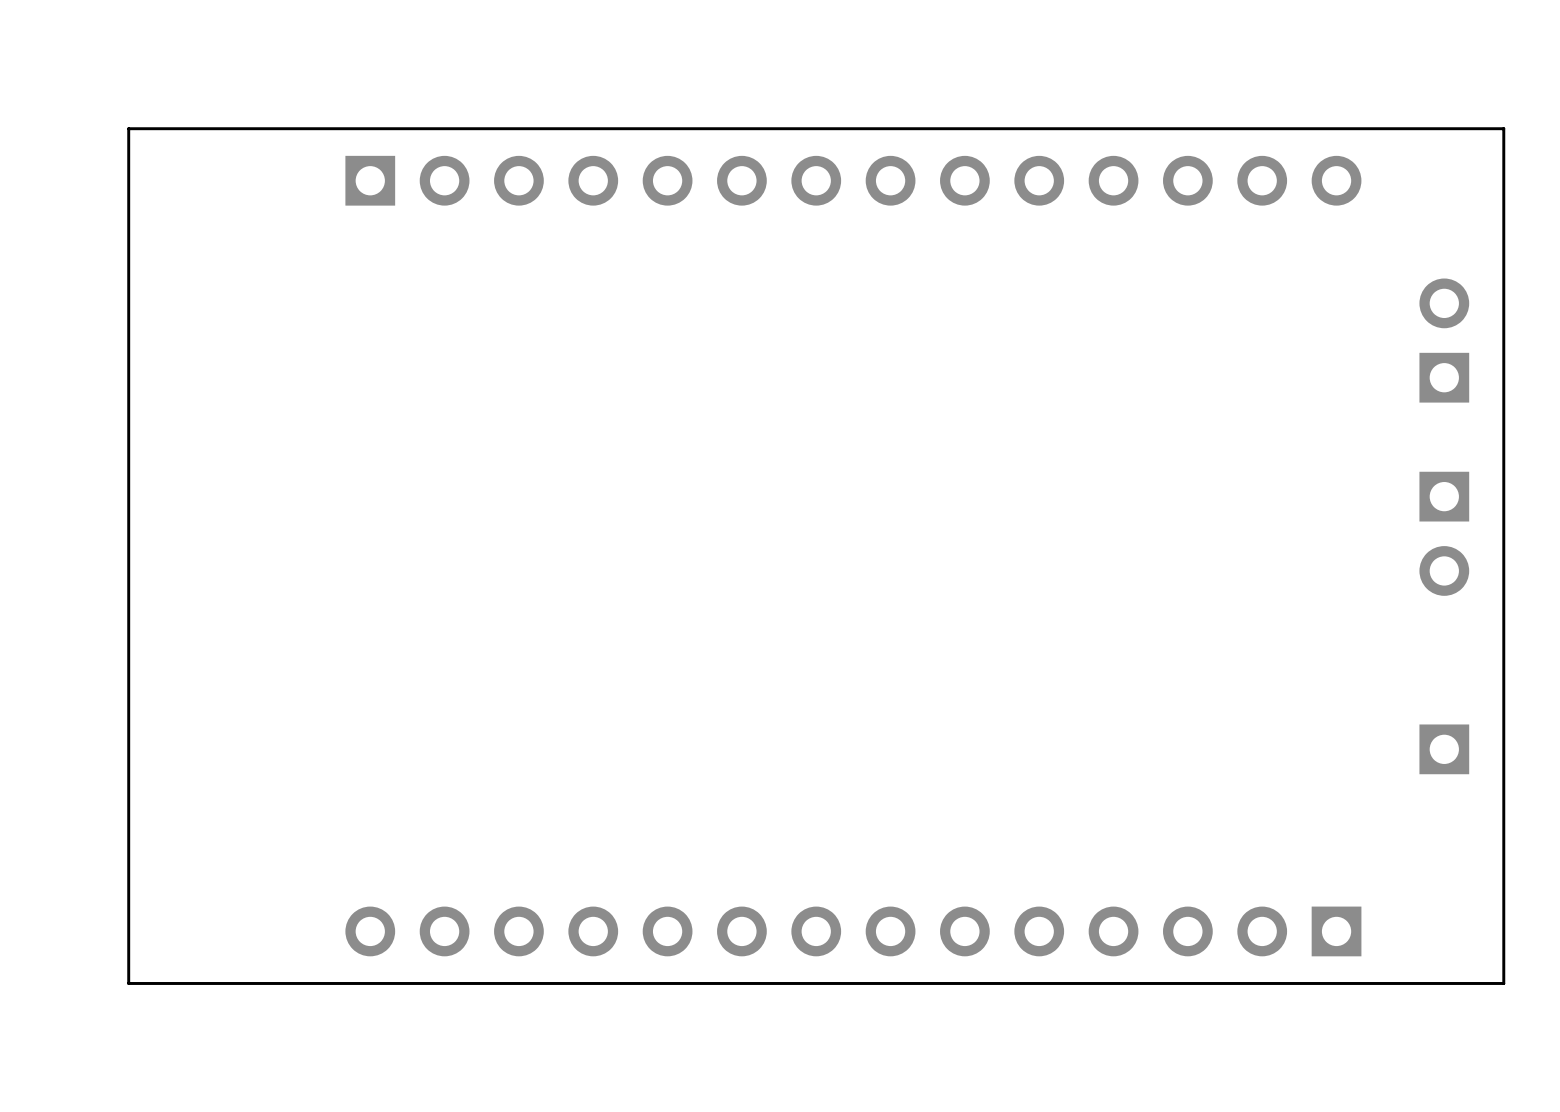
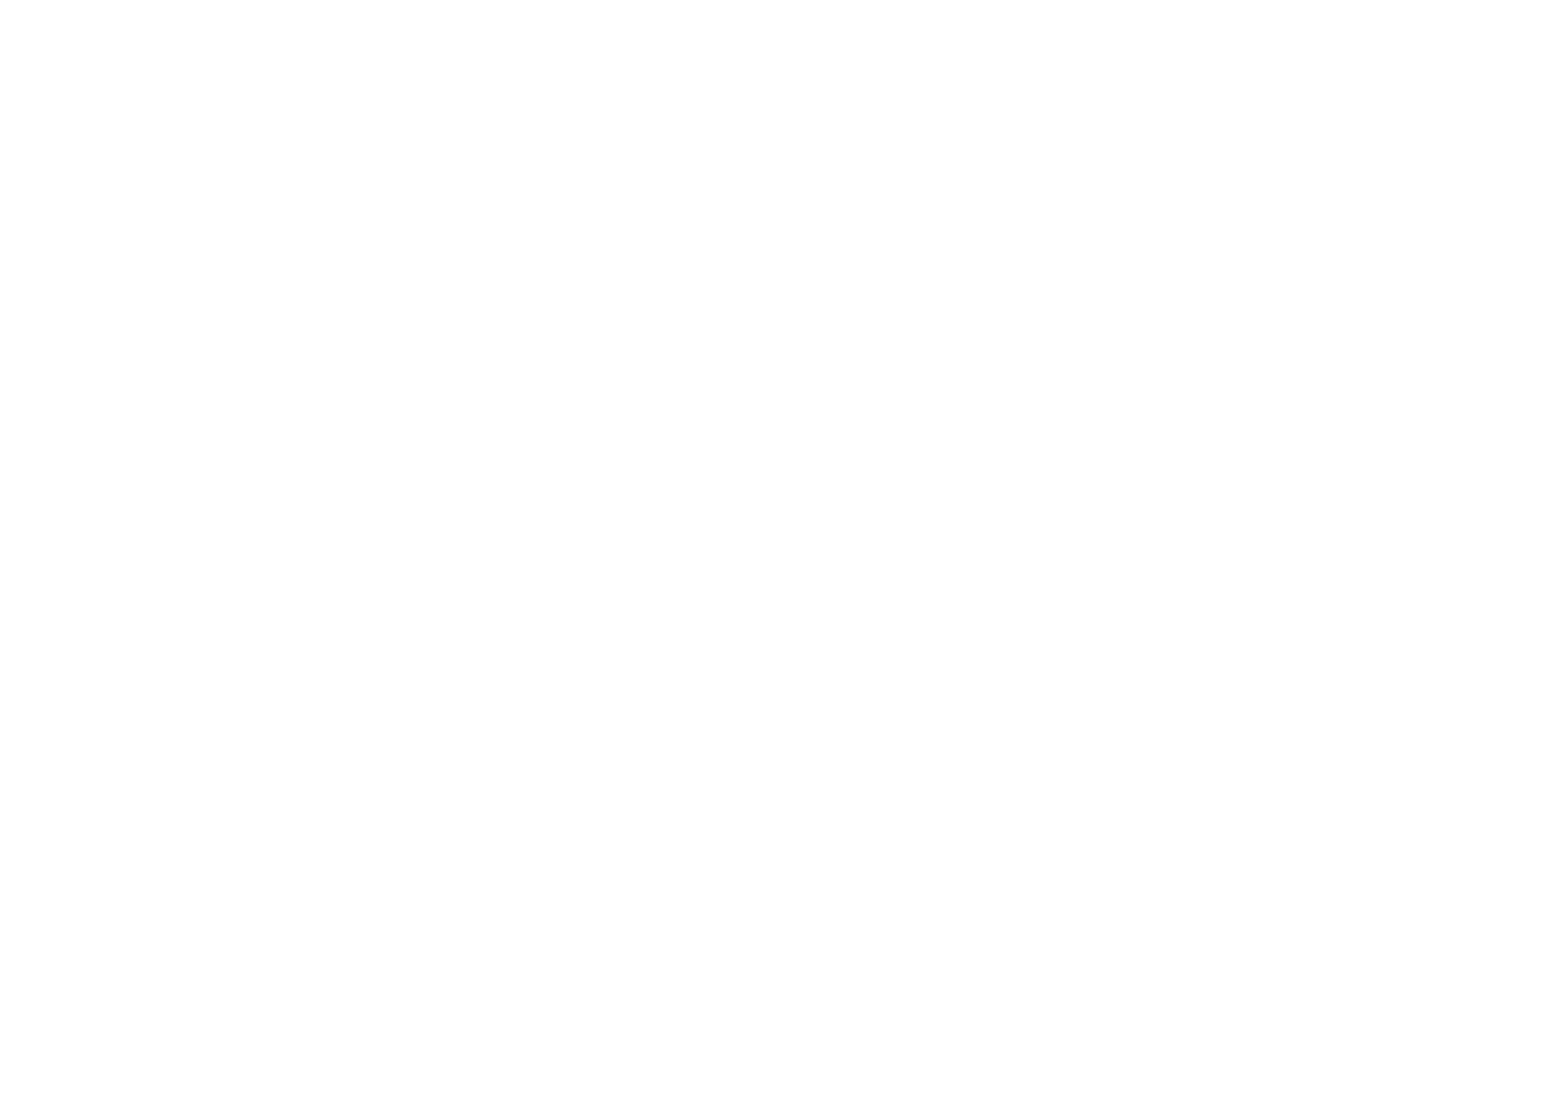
board edge: (1503, 128) (128, 128) (128, 983) (1503, 983) (1503, 128) -> none
part: (853, 180) -> none
part: (1444, 340) -> none
part: (1444, 533) -> none
part: (1444, 749) -> none
part: (853, 931) -> none

